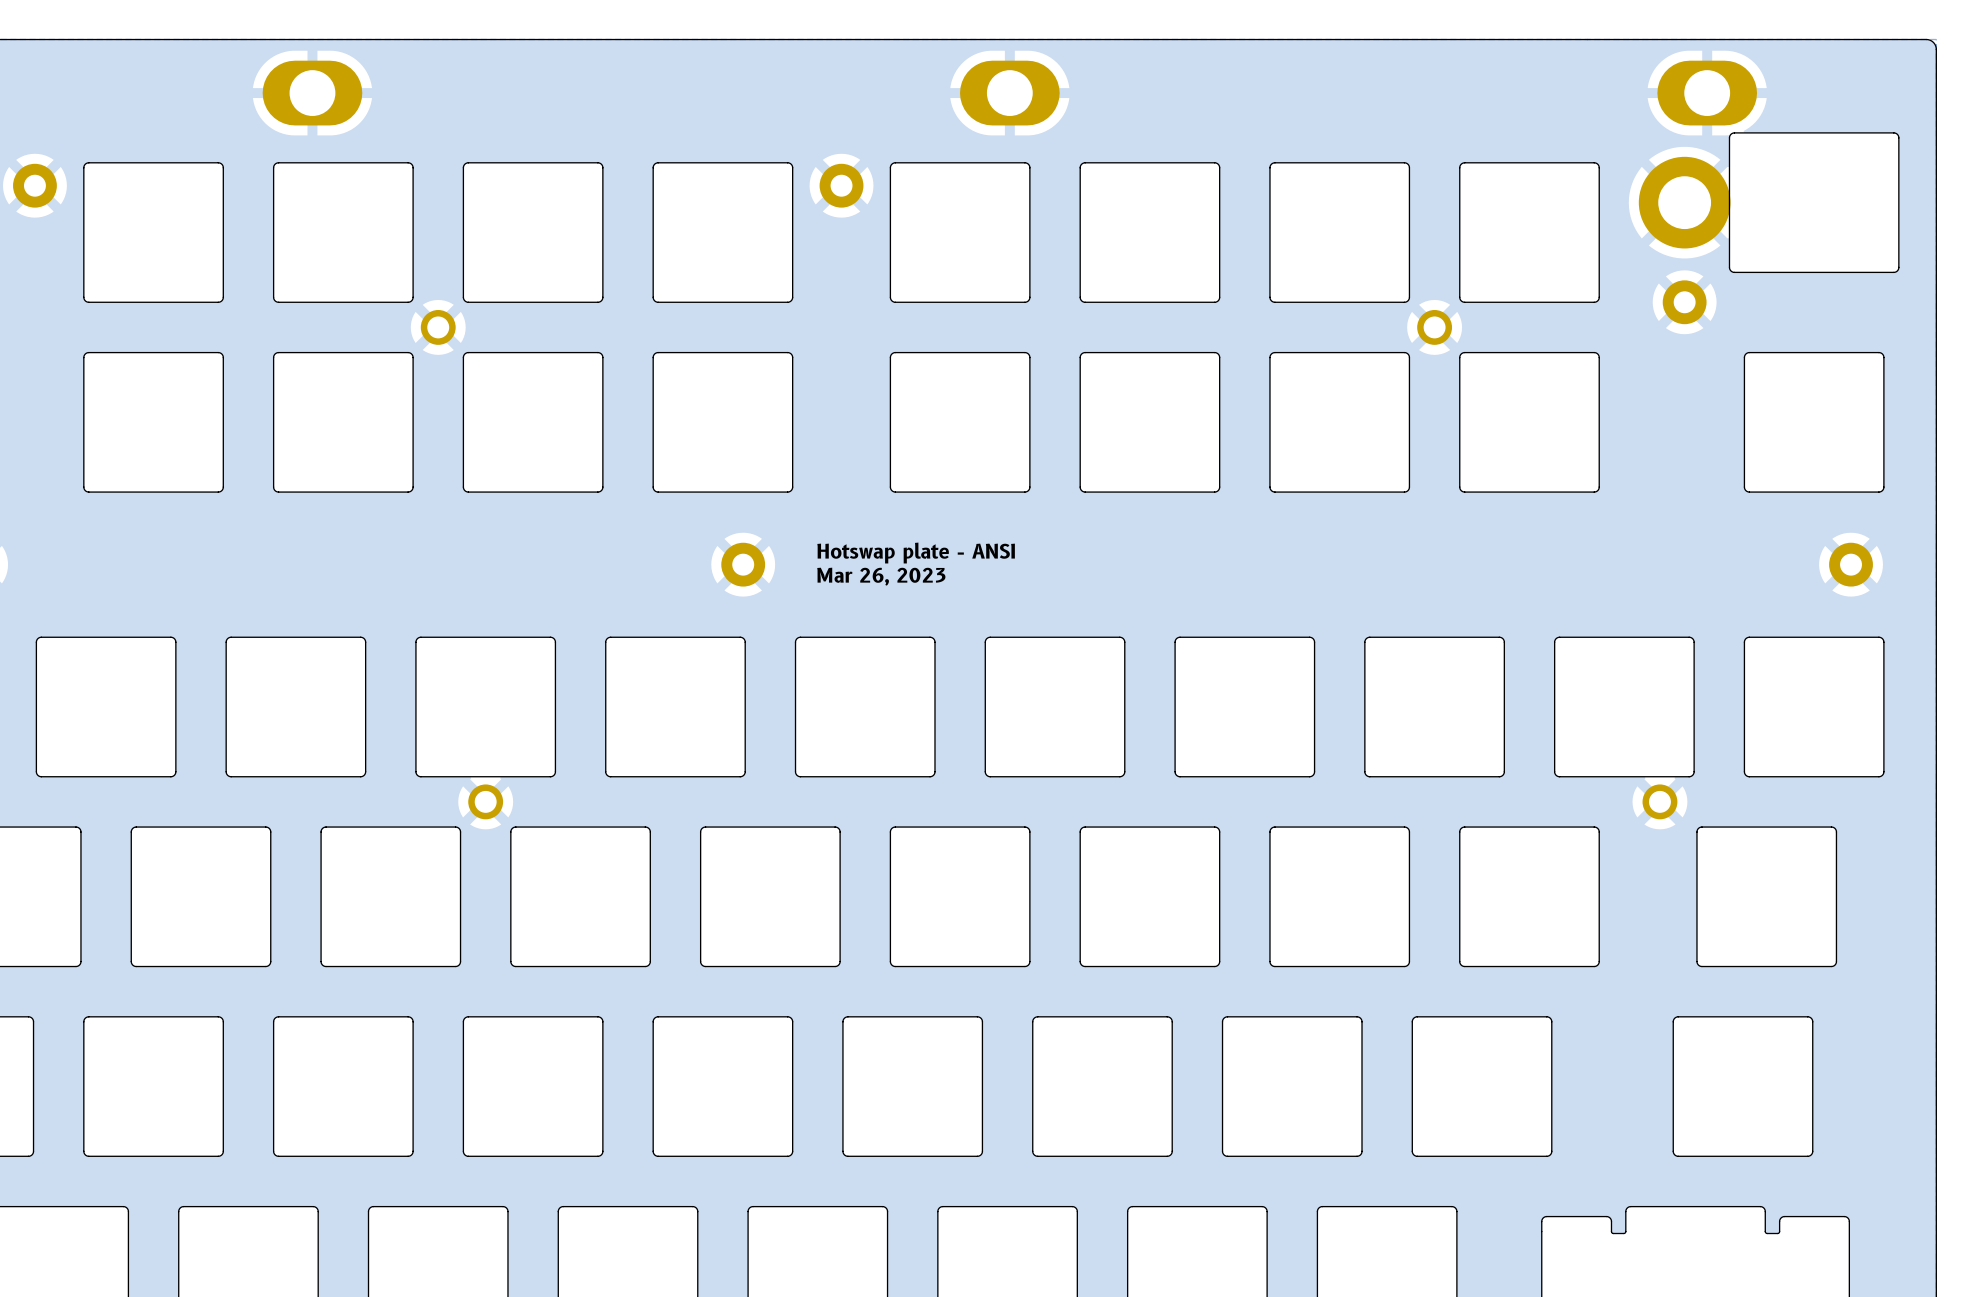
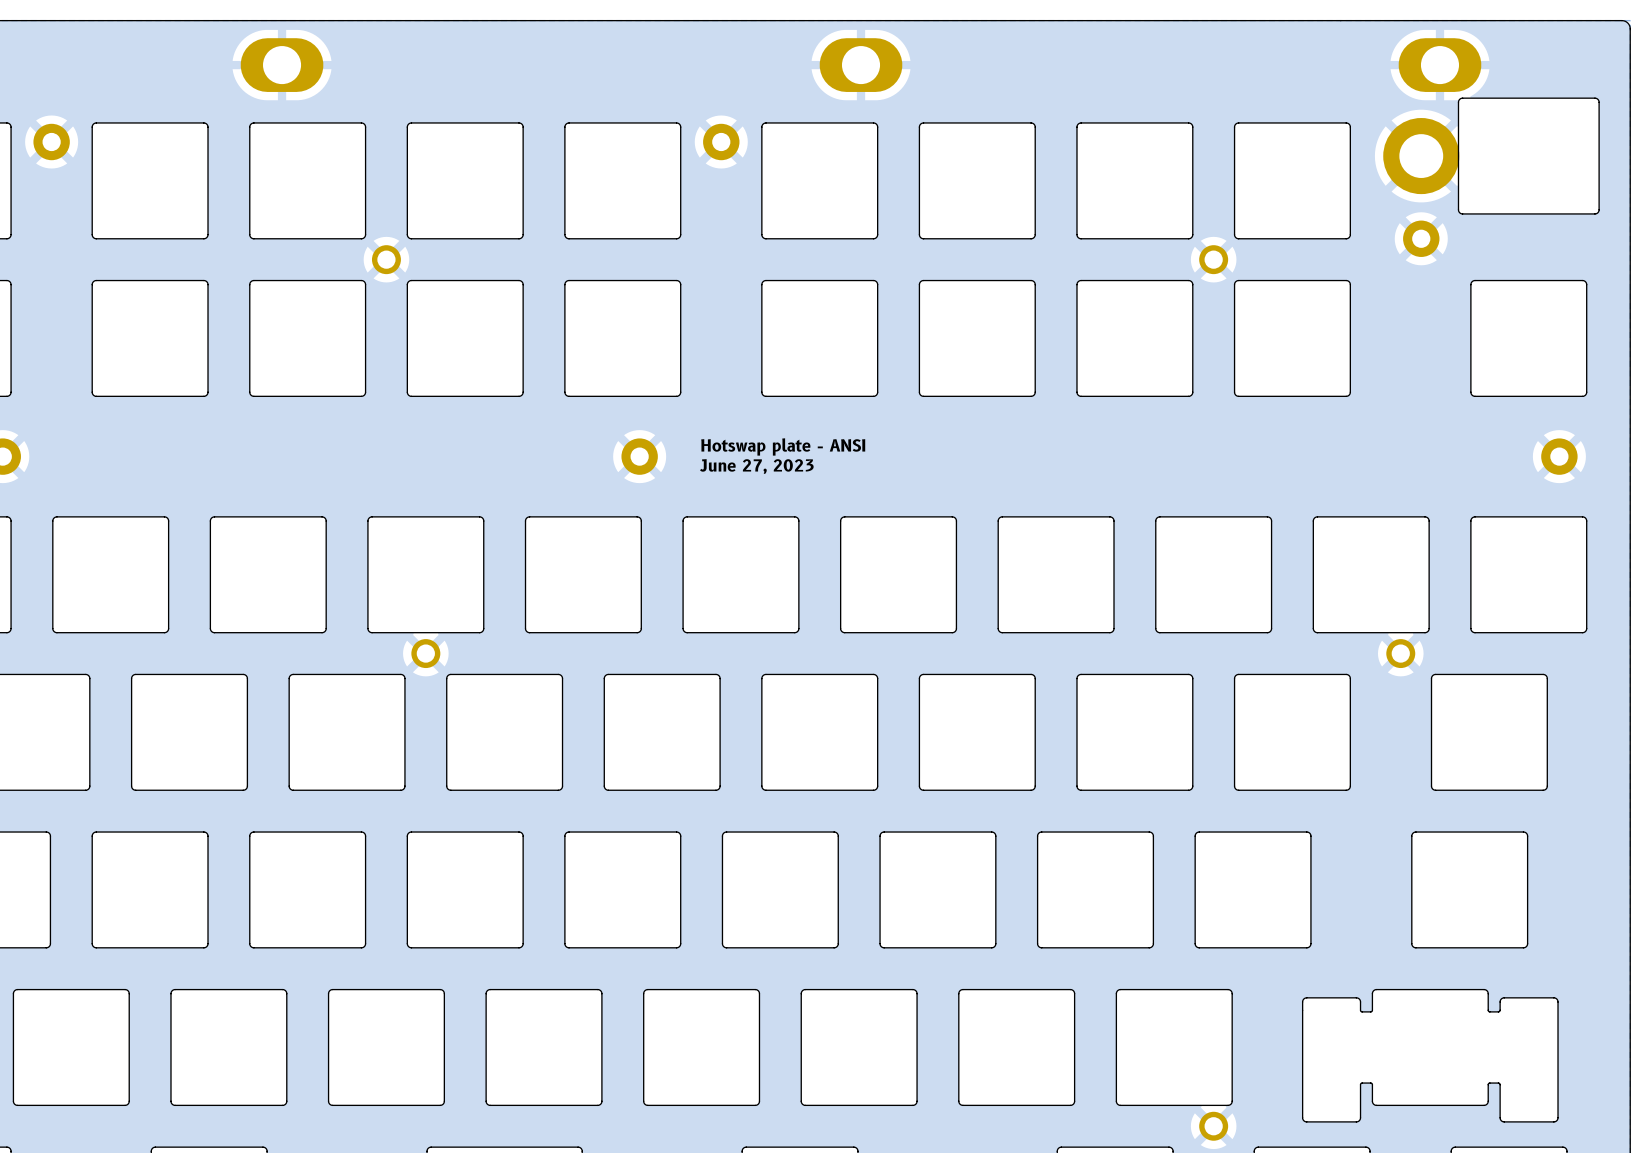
text: Mar 26, 2023 (881, 576) -> June 27, 2023 (756, 466)

